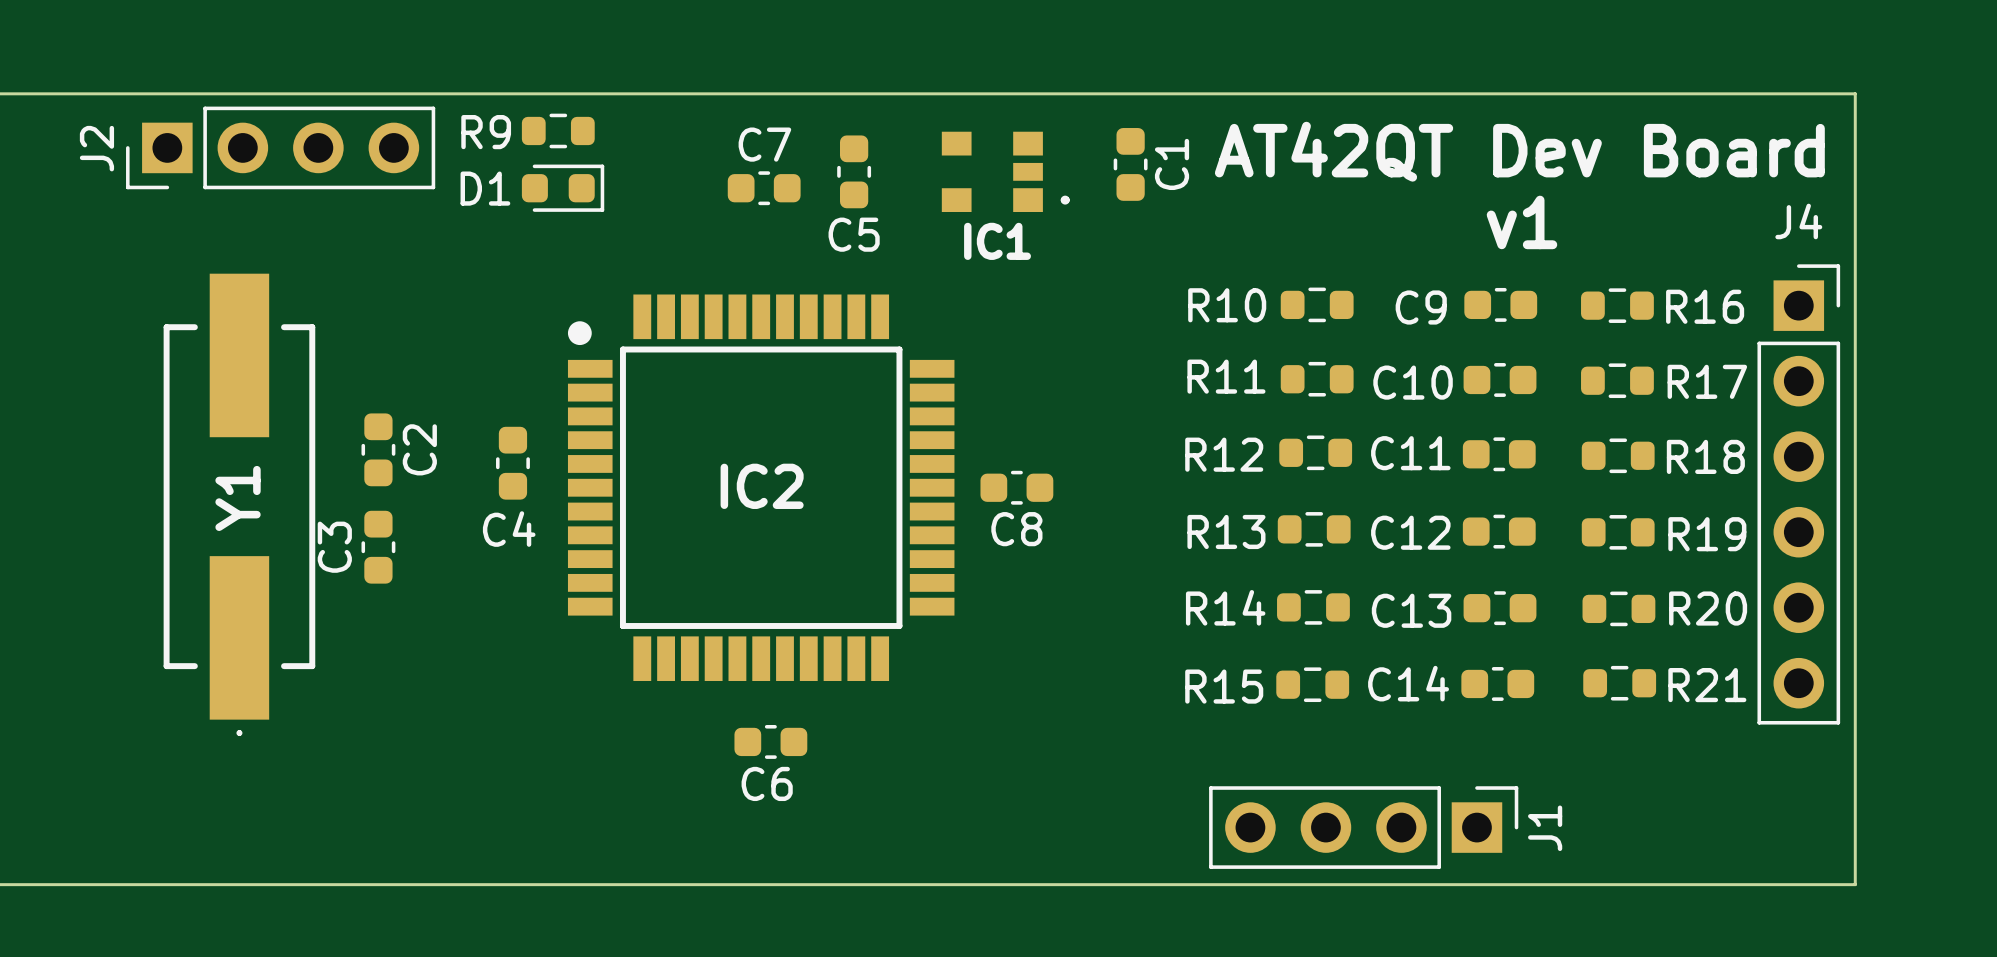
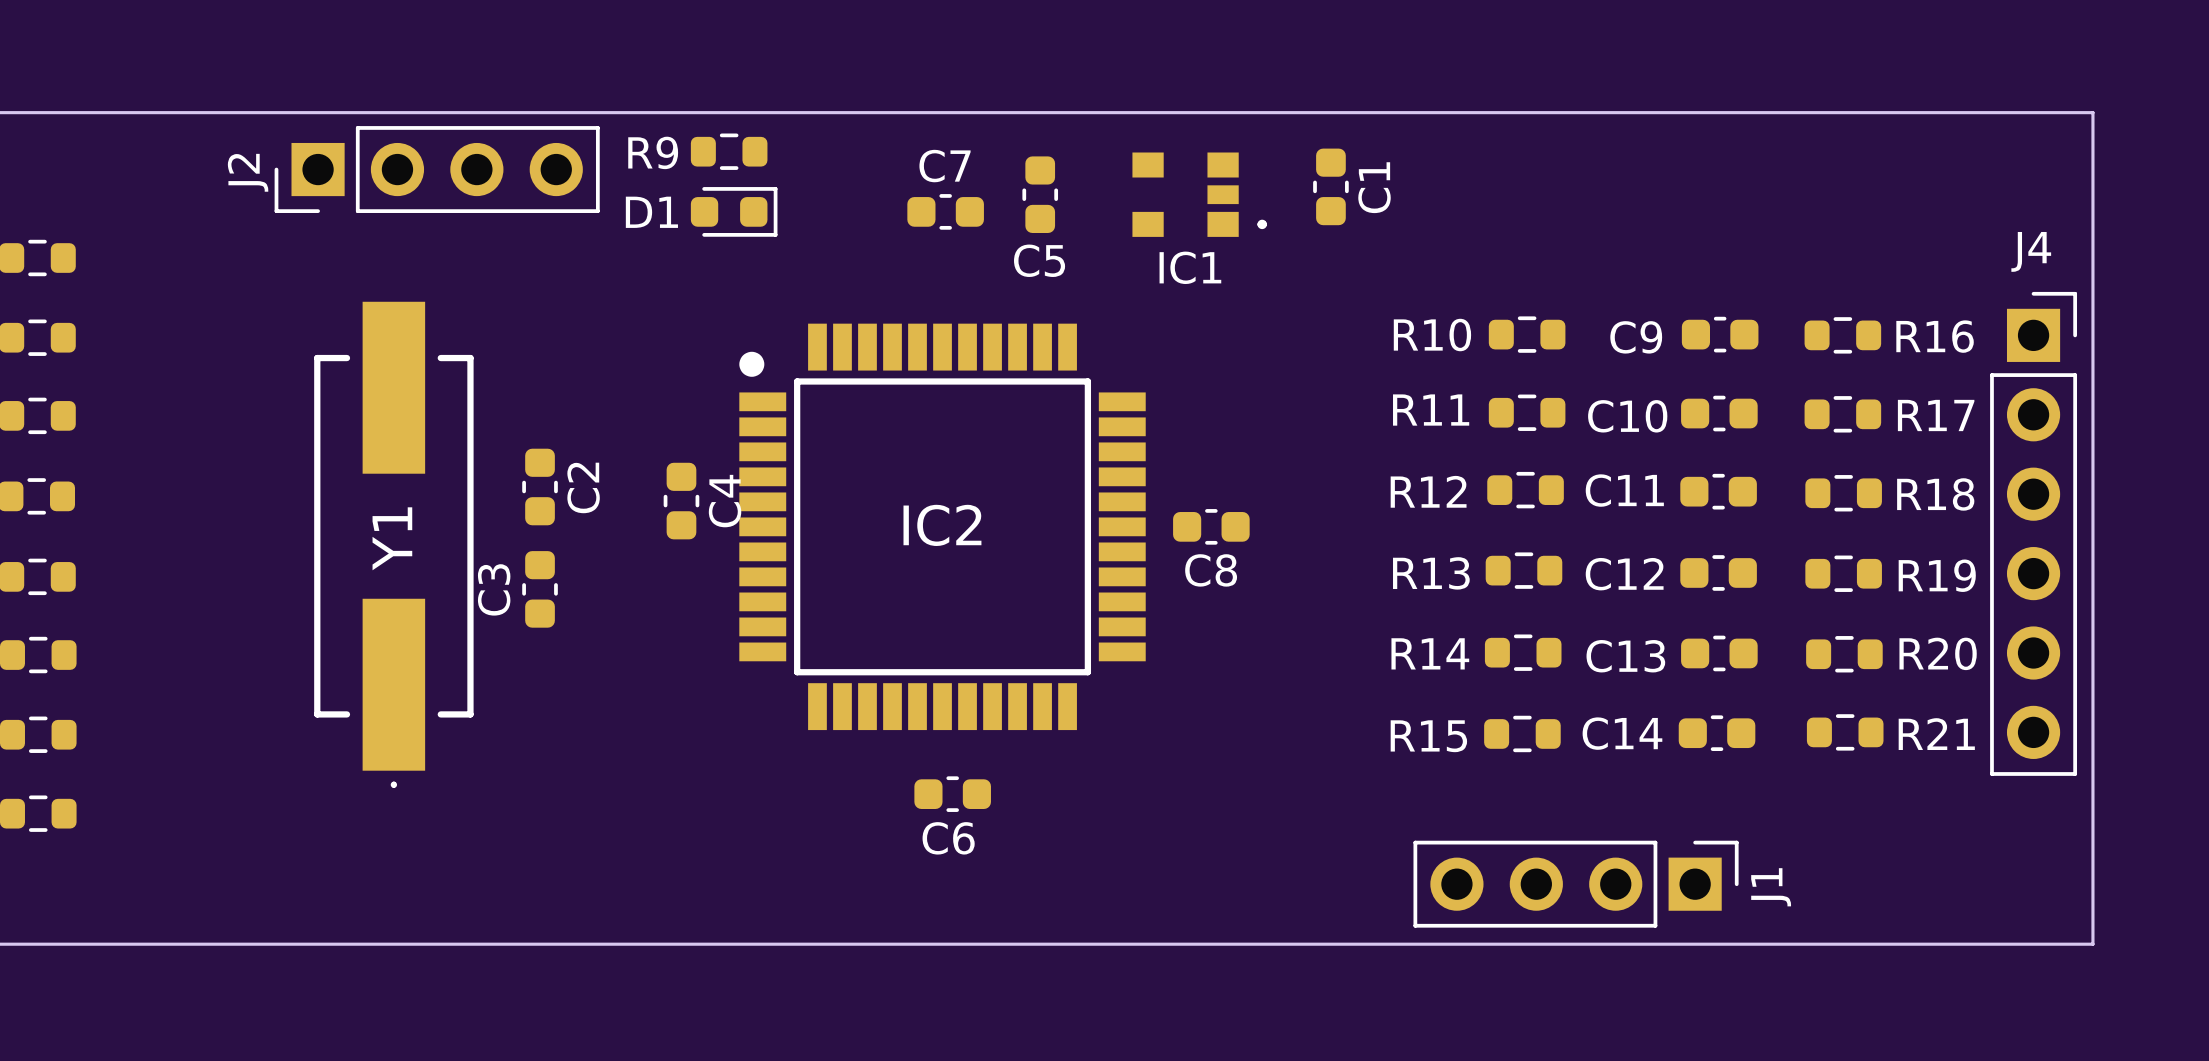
text: AT42QT Dev Board (1519, 151) -> none
text: v1 (1521, 222) -> none
C4 name rotation: 0° (509, 529) -> 90° counterclockwise (725, 501)
C4 name position: C4 (509, 529) -> C4 (725, 501)

